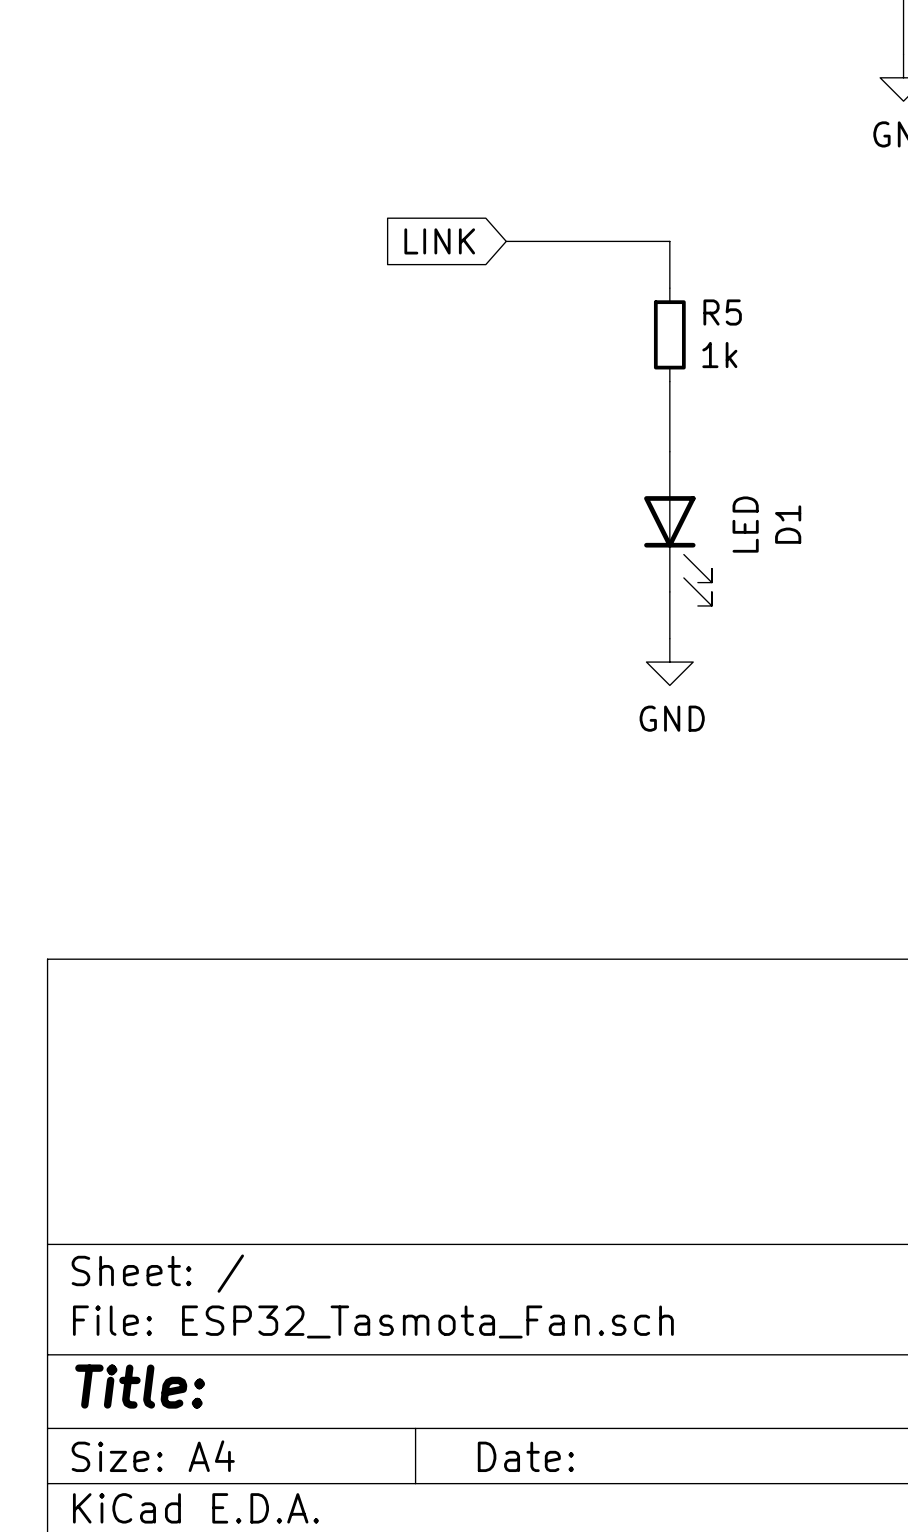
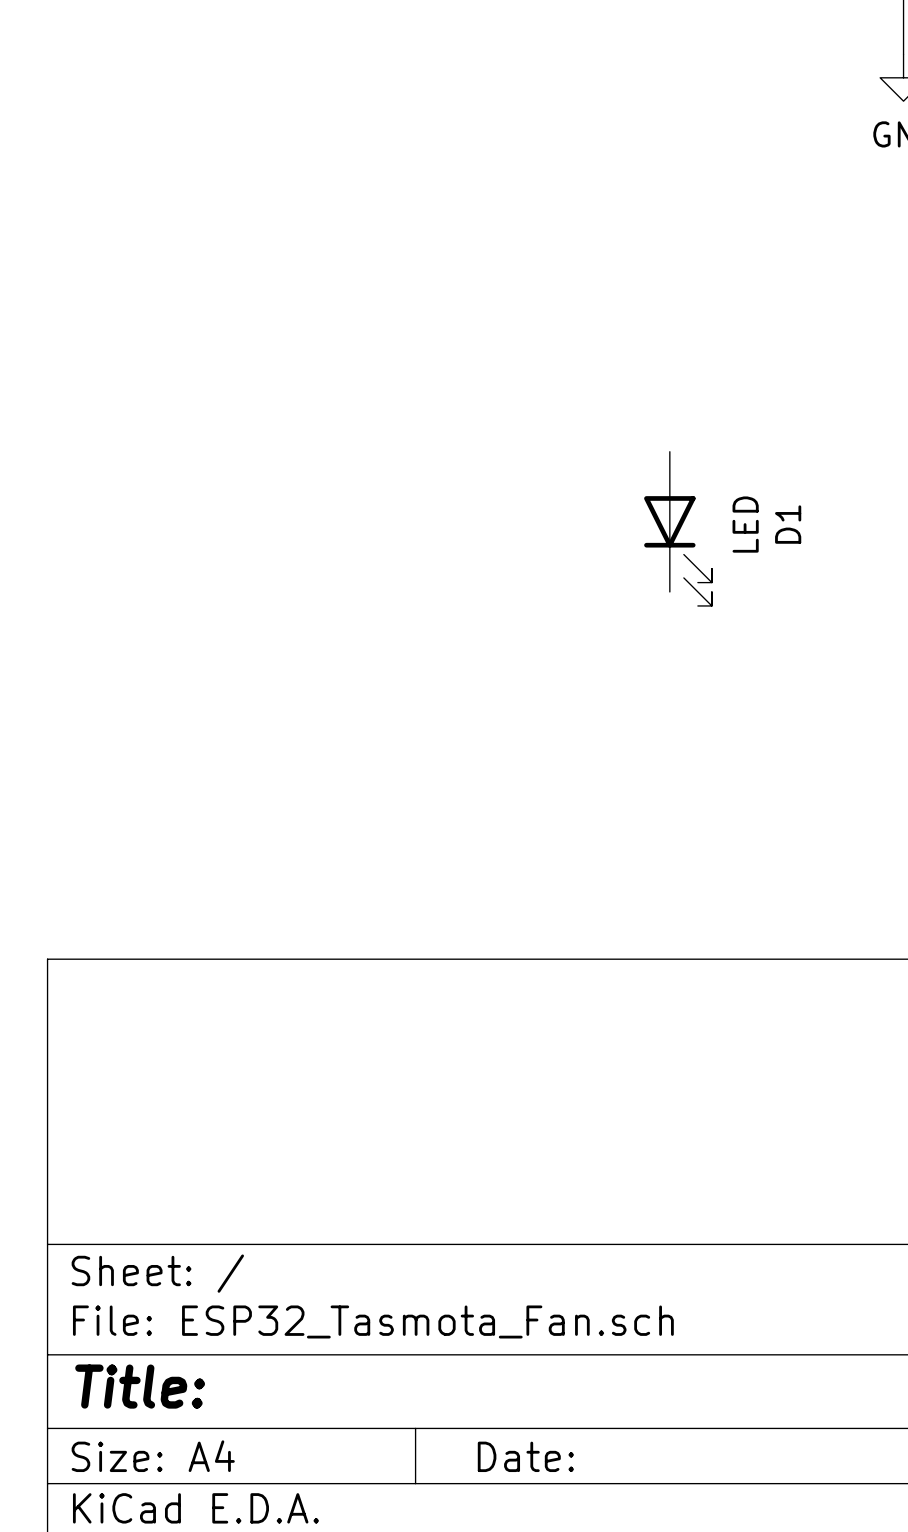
global label: LINK (439, 241) -> none
wire: (506, 241) (669, 241) (669, 288) -> none
R5: 1k (669, 334) -> none
wire: (669, 381) (669, 451) -> none
wire: (669, 591) (669, 638) -> none
power symbol: GND (669, 662) -> none

